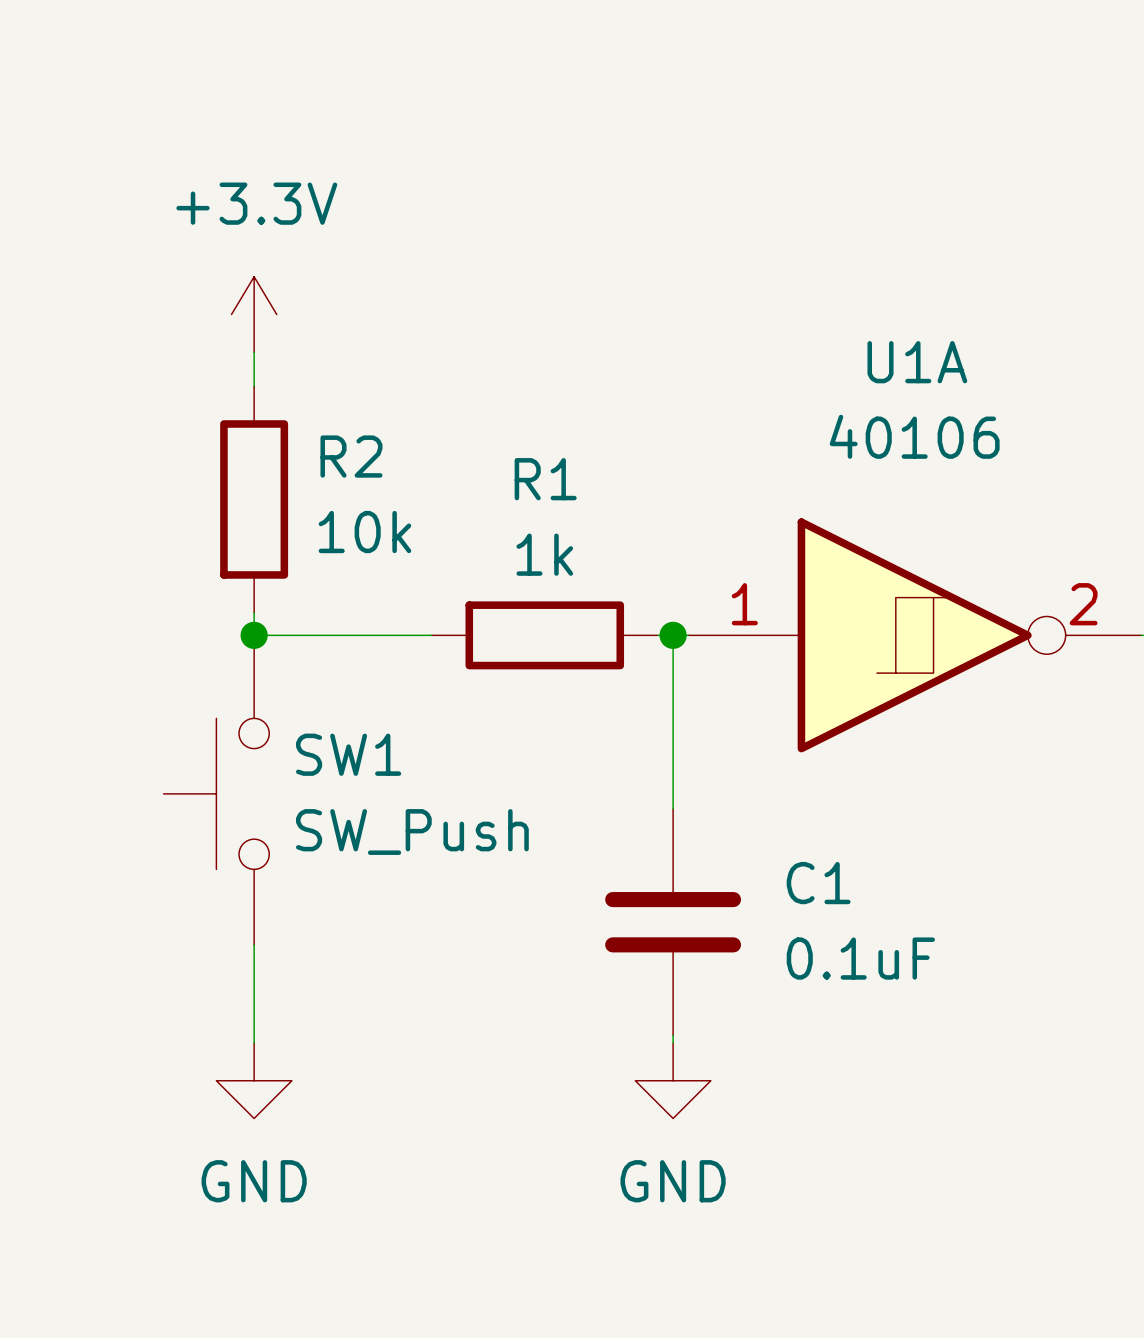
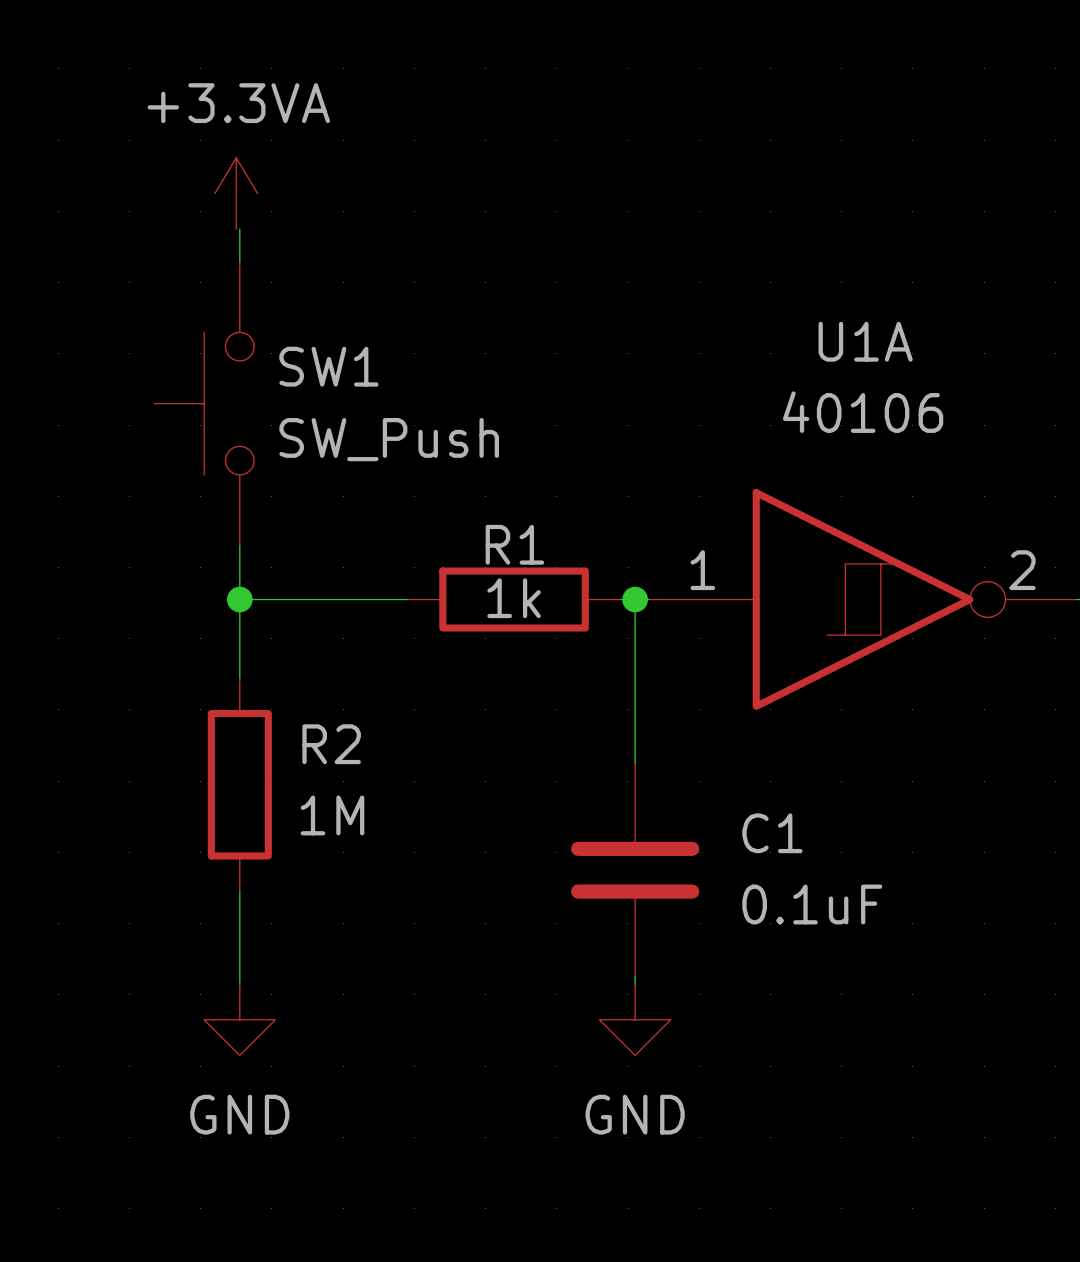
power symbol: none -> +3.3VA (236, 193)
power symbol: +3.3V (254, 314) -> none
wire: (254, 352) (254, 386) -> (239, 229) (239, 261)
R1 name position: R1 (545, 479) -> R1 (514, 544)
R2 position: (254, 499) -> (239, 784)
R2 value: 10k (364, 532) -> 1M (332, 815)
R1 value position: 1k (544, 554) -> 1k (514, 598)
SW1 position: (216, 793) -> (204, 403)

